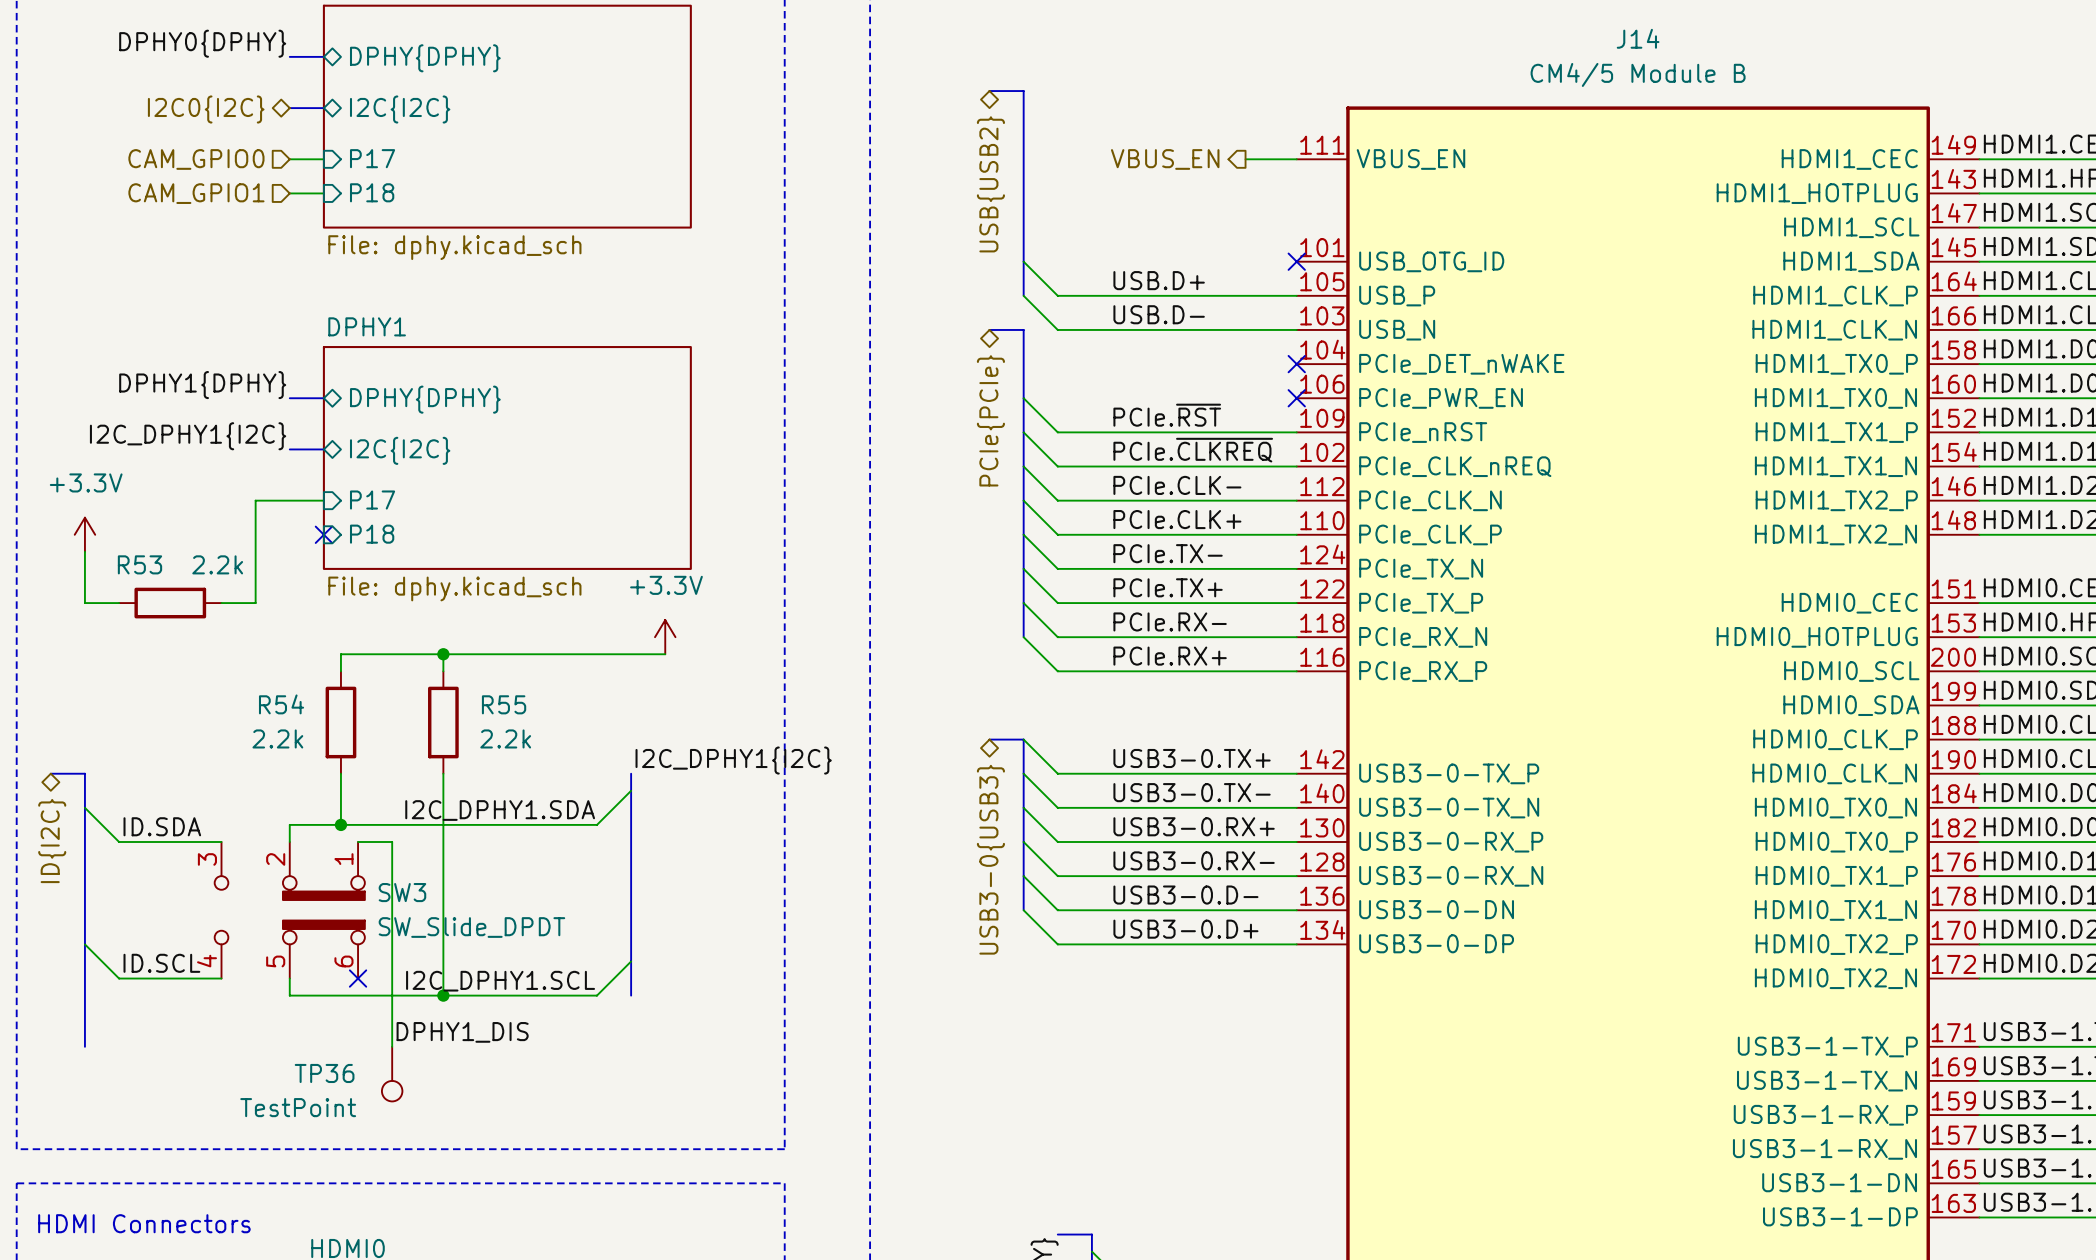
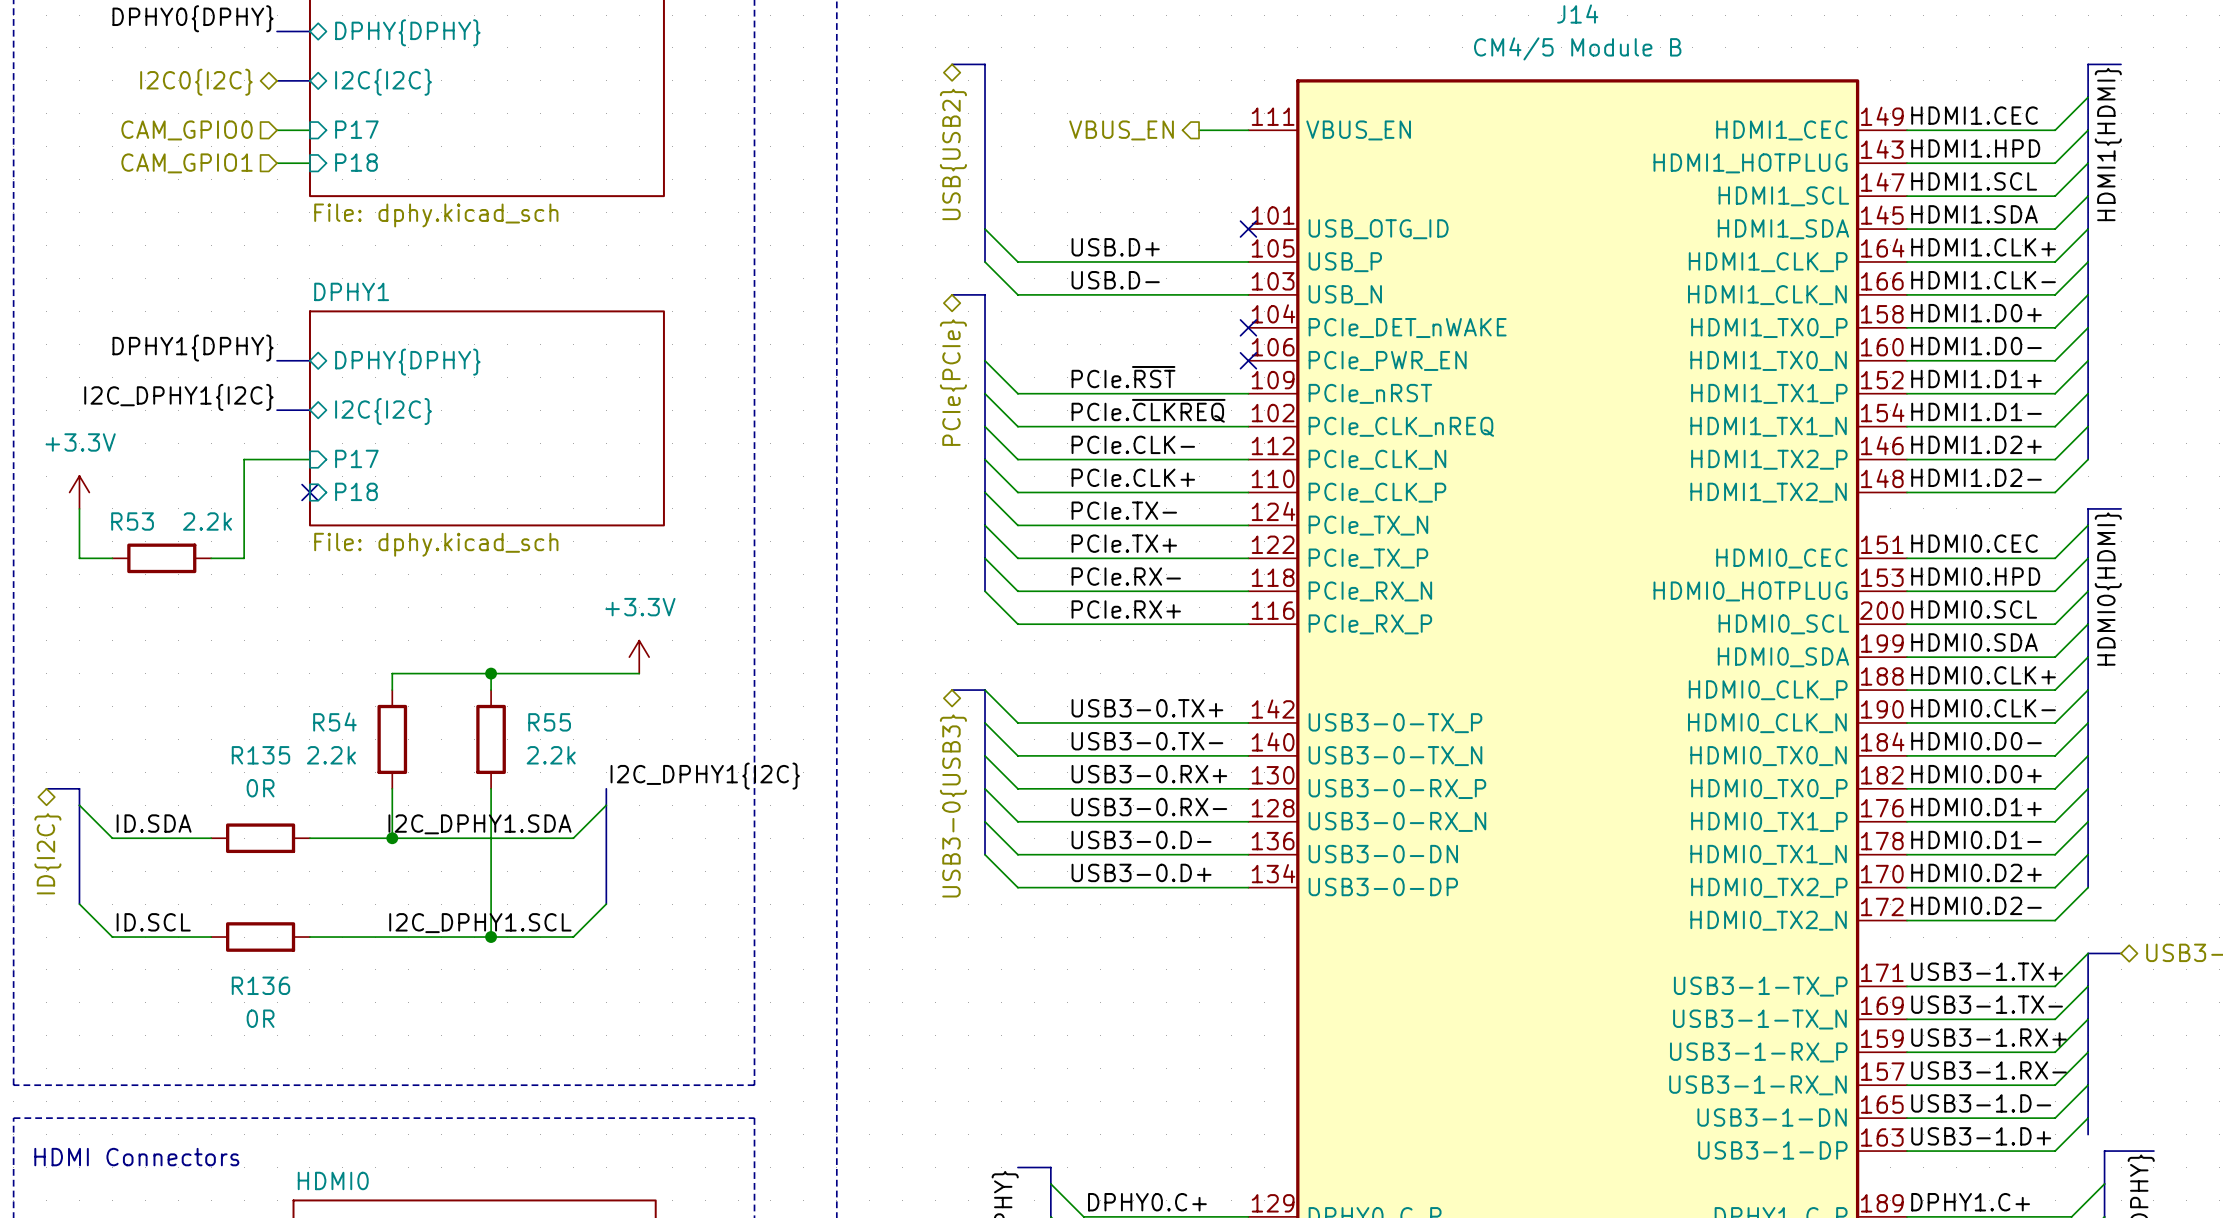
power symbol position: +3.3V (665, 637) -> +3.3V (639, 657)
wire: (443, 654) (443, 671) -> (491, 673) (491, 690)
junction: (443, 654) -> none
wire: (665, 654) (340, 654) (340, 671) -> none
R54 position: (340, 722) -> (392, 739)
R55 position: (443, 722) -> (491, 739)
junction: none -> (491, 673)
wire: none -> (639, 673) (392, 673) (392, 690)
label position: I2C_DPHY1{I2C} (733, 760) -> I2C_DPHY1{I2C} (705, 776)
bus: (50, 773) (84, 773) (84, 841) -> (46, 788) (79, 788)
wire: (340, 773) (340, 824) -> (392, 788) (392, 838)
wire: (443, 773) (443, 995) -> none
bus: (631, 773) (631, 841) -> none
wire: (631, 790) (596, 824) (289, 824) (289, 841) -> none
wire: (84, 807) (119, 841) (221, 841) -> (79, 805) (112, 838) (211, 838)
label position: I2C_DPHY1.SDA (500, 810) -> I2C_DPHY1.SDA (479, 824)
junction: (340, 824) -> none
label position: ID.SDA (162, 826) -> ID.SDA (154, 823)
hierarchical label position: ID{I2C} (52, 841) -> ID{I2C} (47, 853)
wire: (358, 841) (392, 841) (392, 1046) -> none
wire: none -> (491, 788) (491, 937)
wire: none -> (606, 805) (573, 838) (309, 838)
R135: none -> 0R (260, 838)
junction: none -> (392, 838)
SW3: SW_Slide_DPDT (289, 910) -> none
wire: (84, 944) (119, 978) (221, 978) -> (79, 904) (112, 937) (211, 937)
bus: (84, 961) (84, 1046) -> none
bus: (631, 961) (631, 995) -> none
label position: ID.SCL (161, 963) -> ID.SCL (153, 922)
wire: (289, 978) (289, 995) (323, 995) -> none
no-connect mark: (358, 978) -> none
R136: none -> 0R (260, 937)
junction: (443, 995) -> none
junction: none -> (491, 937)
label: DPHY1_DIS (462, 1032) -> none
TP36: TestPoint (392, 1074) -> none

